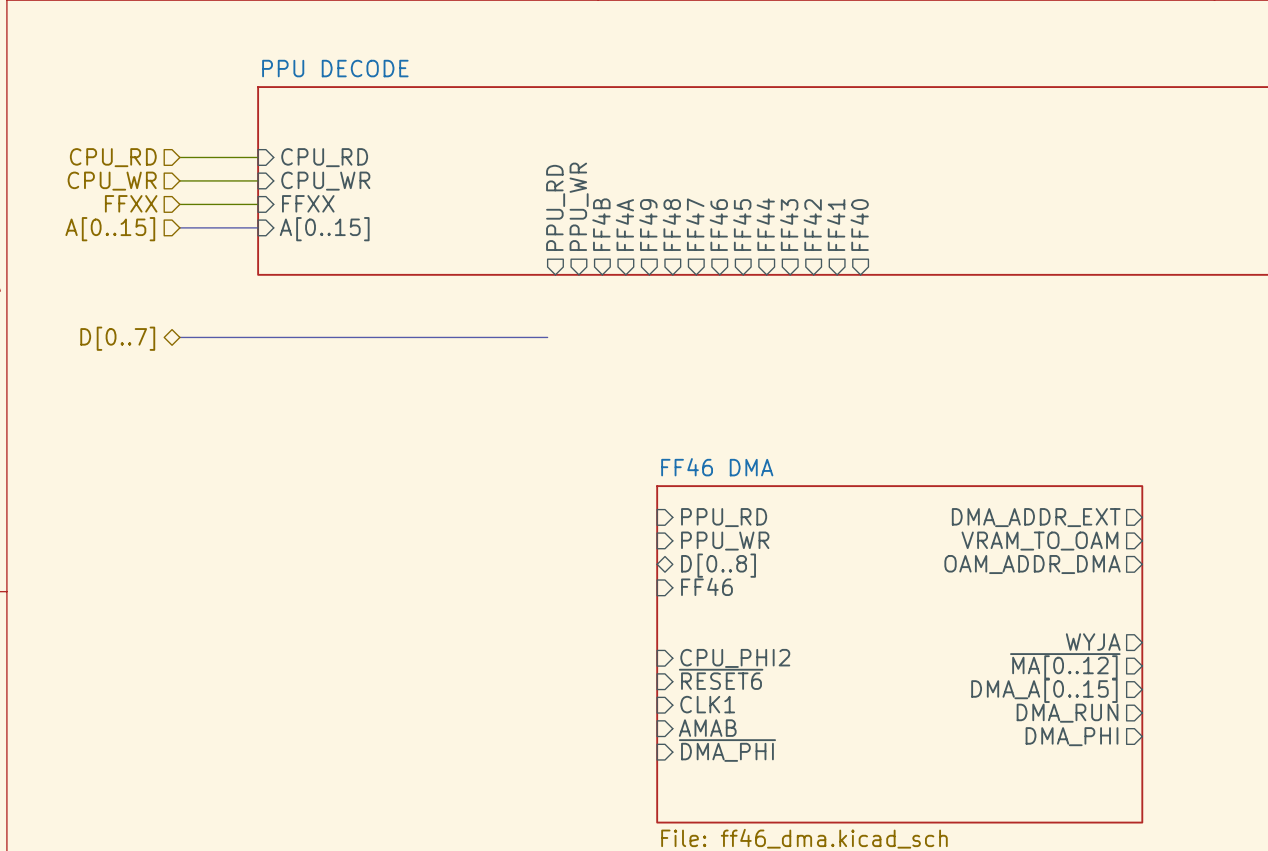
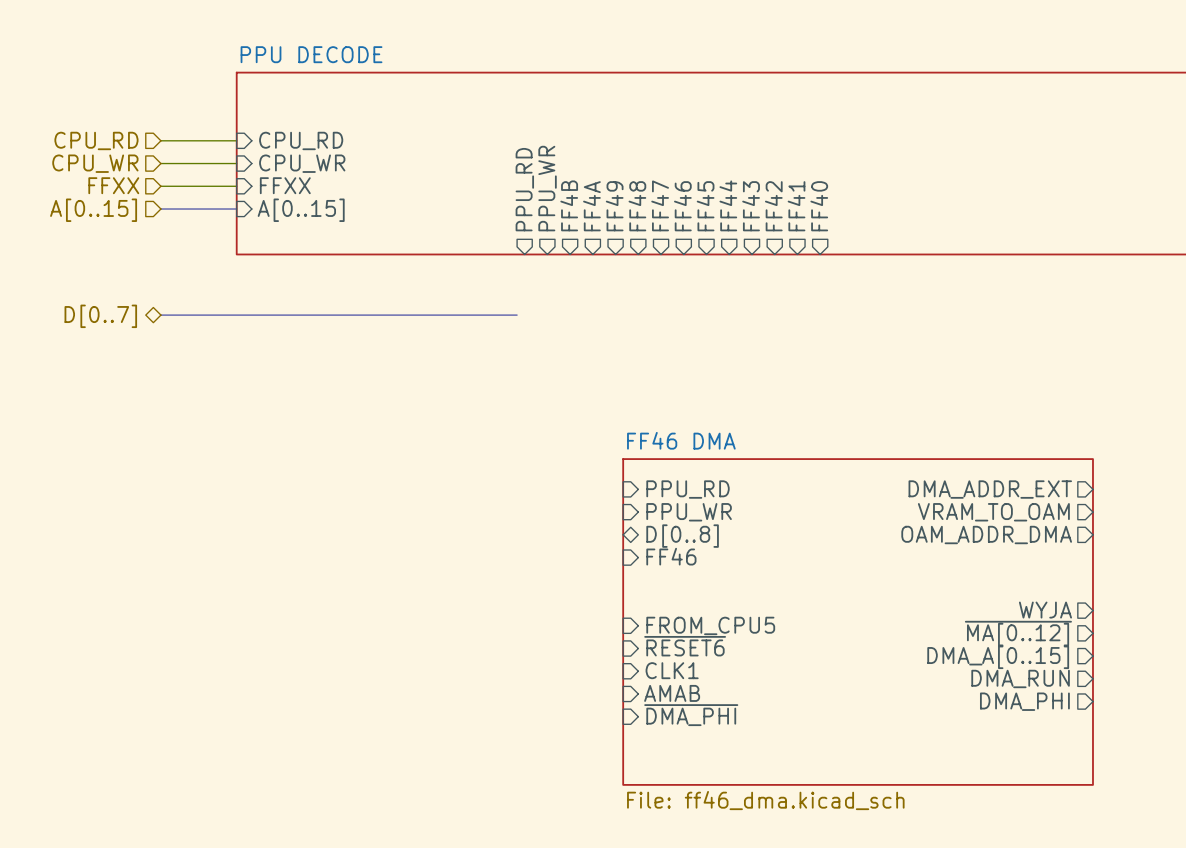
sheet pin: CPU_PHI2 (735, 658) -> FROM_CPU5 (710, 625)

